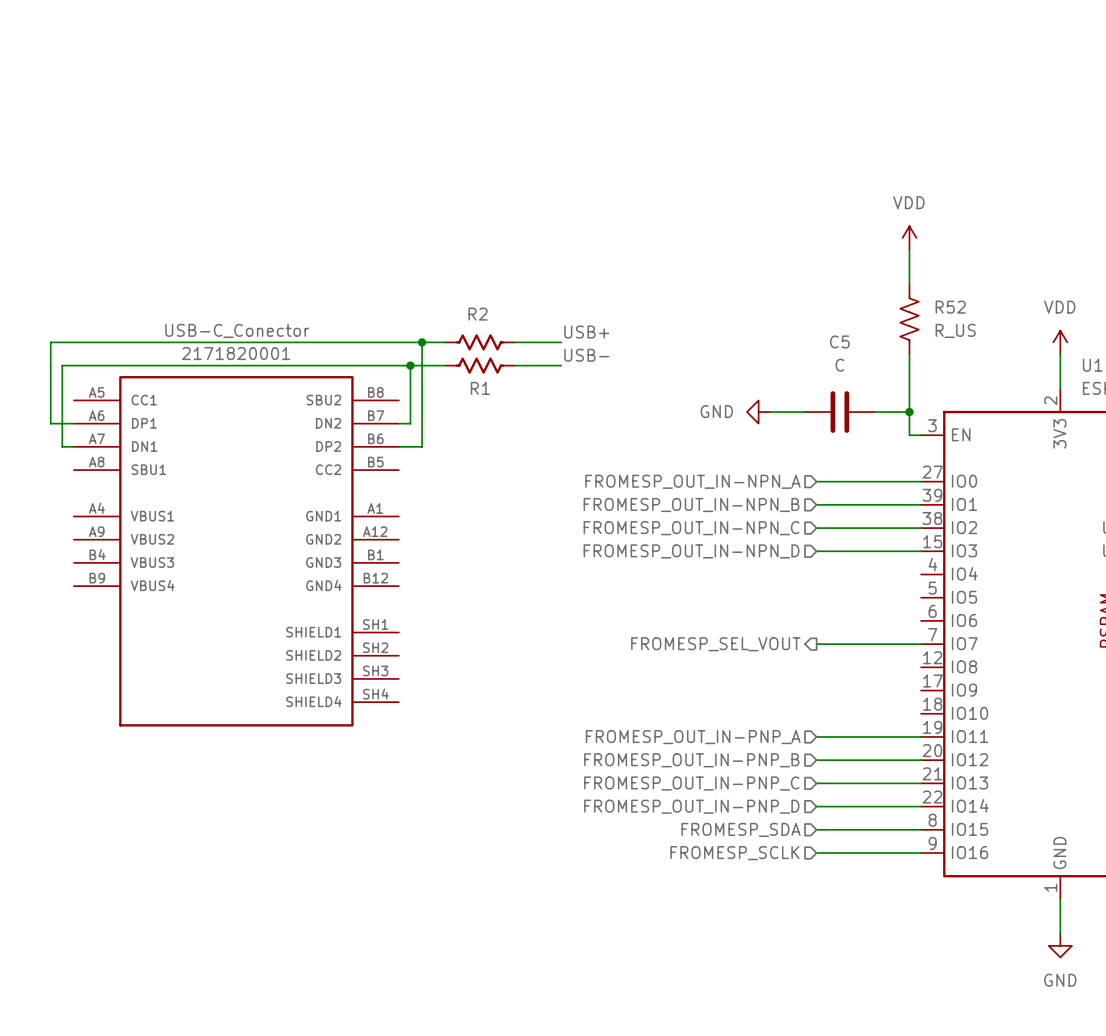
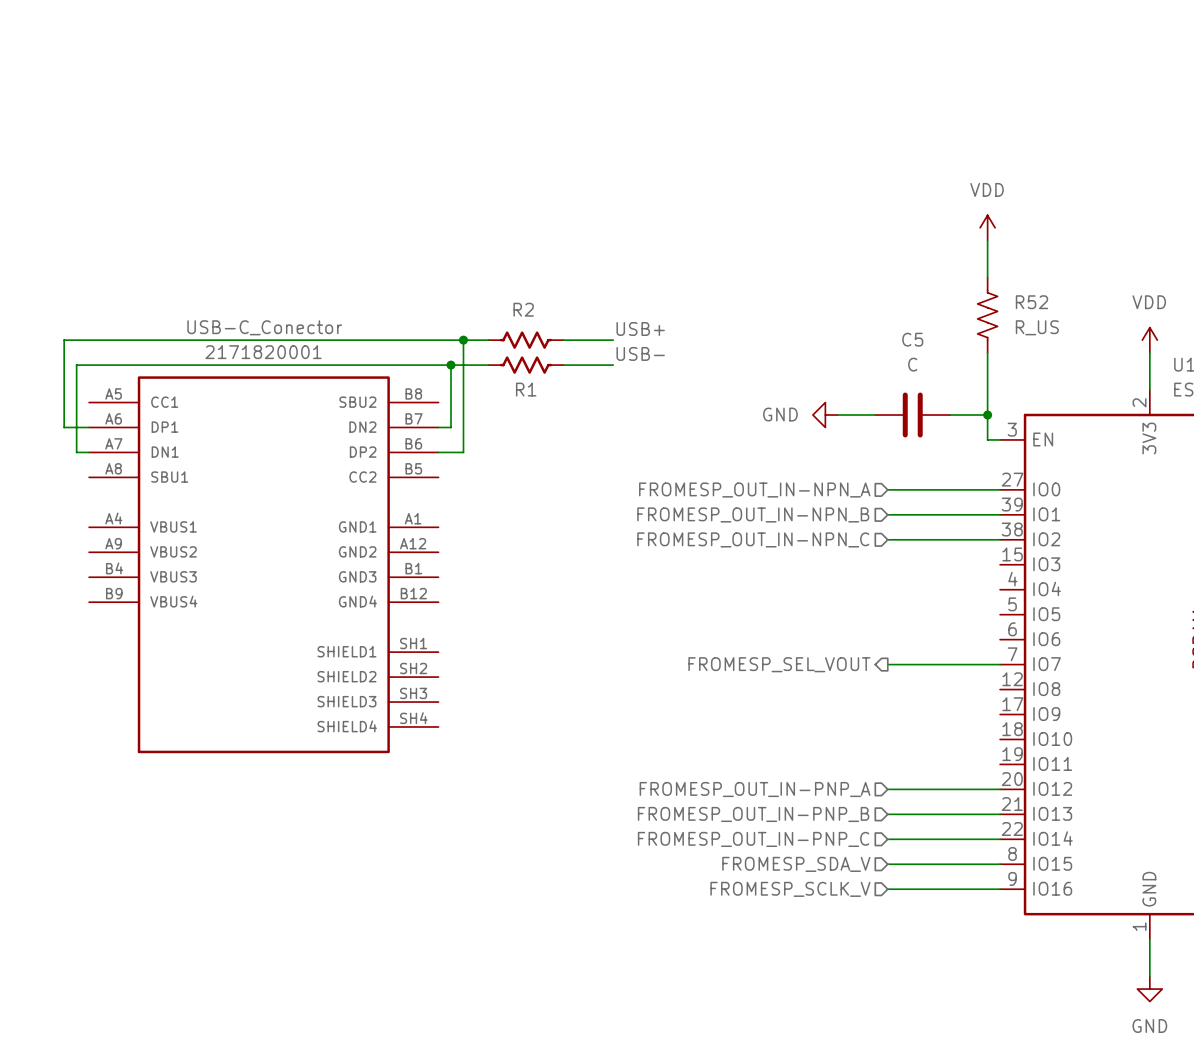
hierarchical label: FROMESP_OUT_IN-NPN_D (691, 551) -> none
wire: (816, 551) (921, 551) -> none
wire: (816, 736) (921, 736) -> none
hierarchical label: FROMESP_OUT_IN-PNP_A (693, 737) -> none
hierarchical label: FROMESP_OUT_IN-PNP_B (691, 760) -> FROMESP_OUT_IN-PNP_A (755, 789)
hierarchical label: FROMESP_OUT_IN-PNP_C (691, 783) -> FROMESP_OUT_IN-PNP_B (753, 814)
hierarchical label: FROMESP_OUT_IN-PNP_D (691, 806) -> FROMESP_OUT_IN-PNP_C (753, 839)
hierarchical label: FROMESP_SDA (741, 829) -> FROMESP_SDA_V (796, 864)
hierarchical label: FROMESP_SCLK (734, 853) -> FROMESP_SCLK_V (790, 889)

